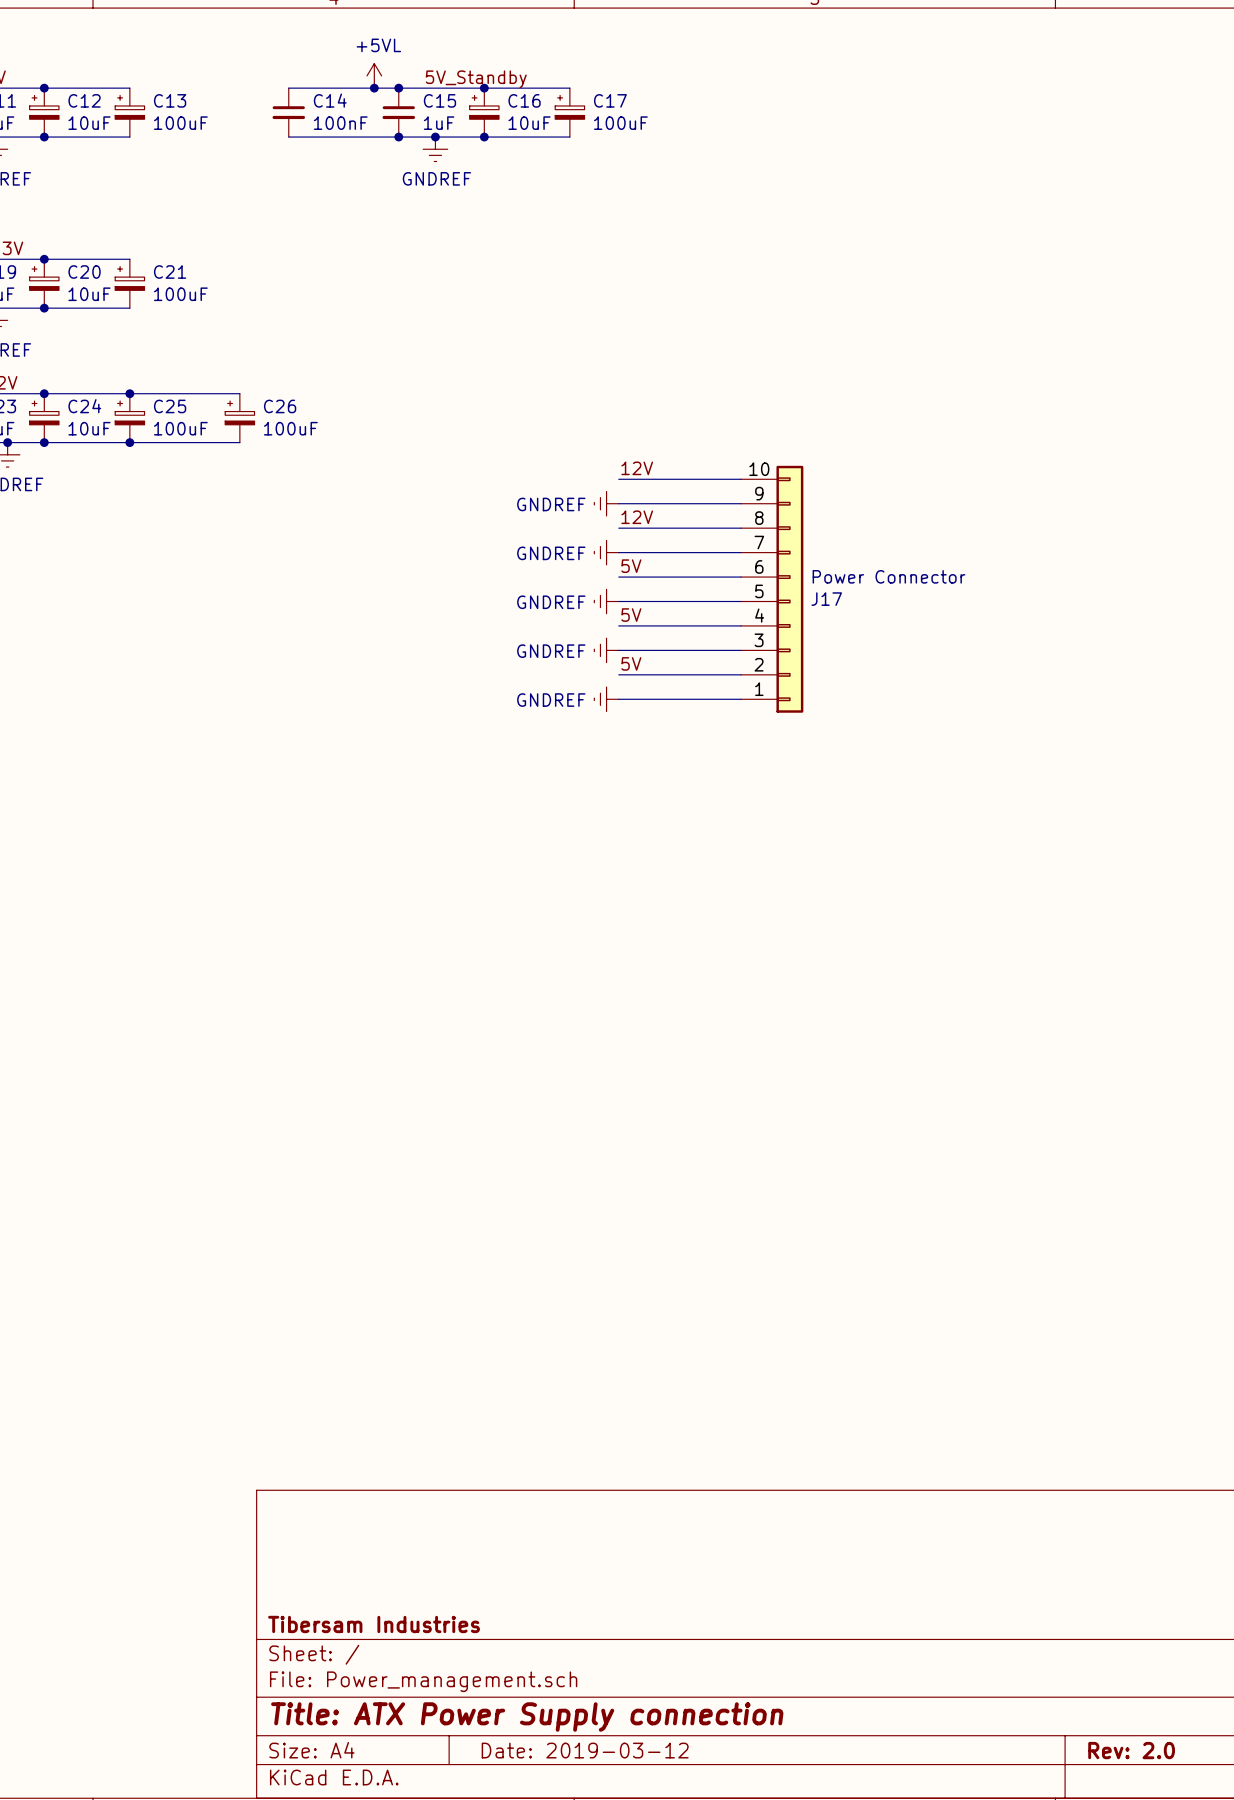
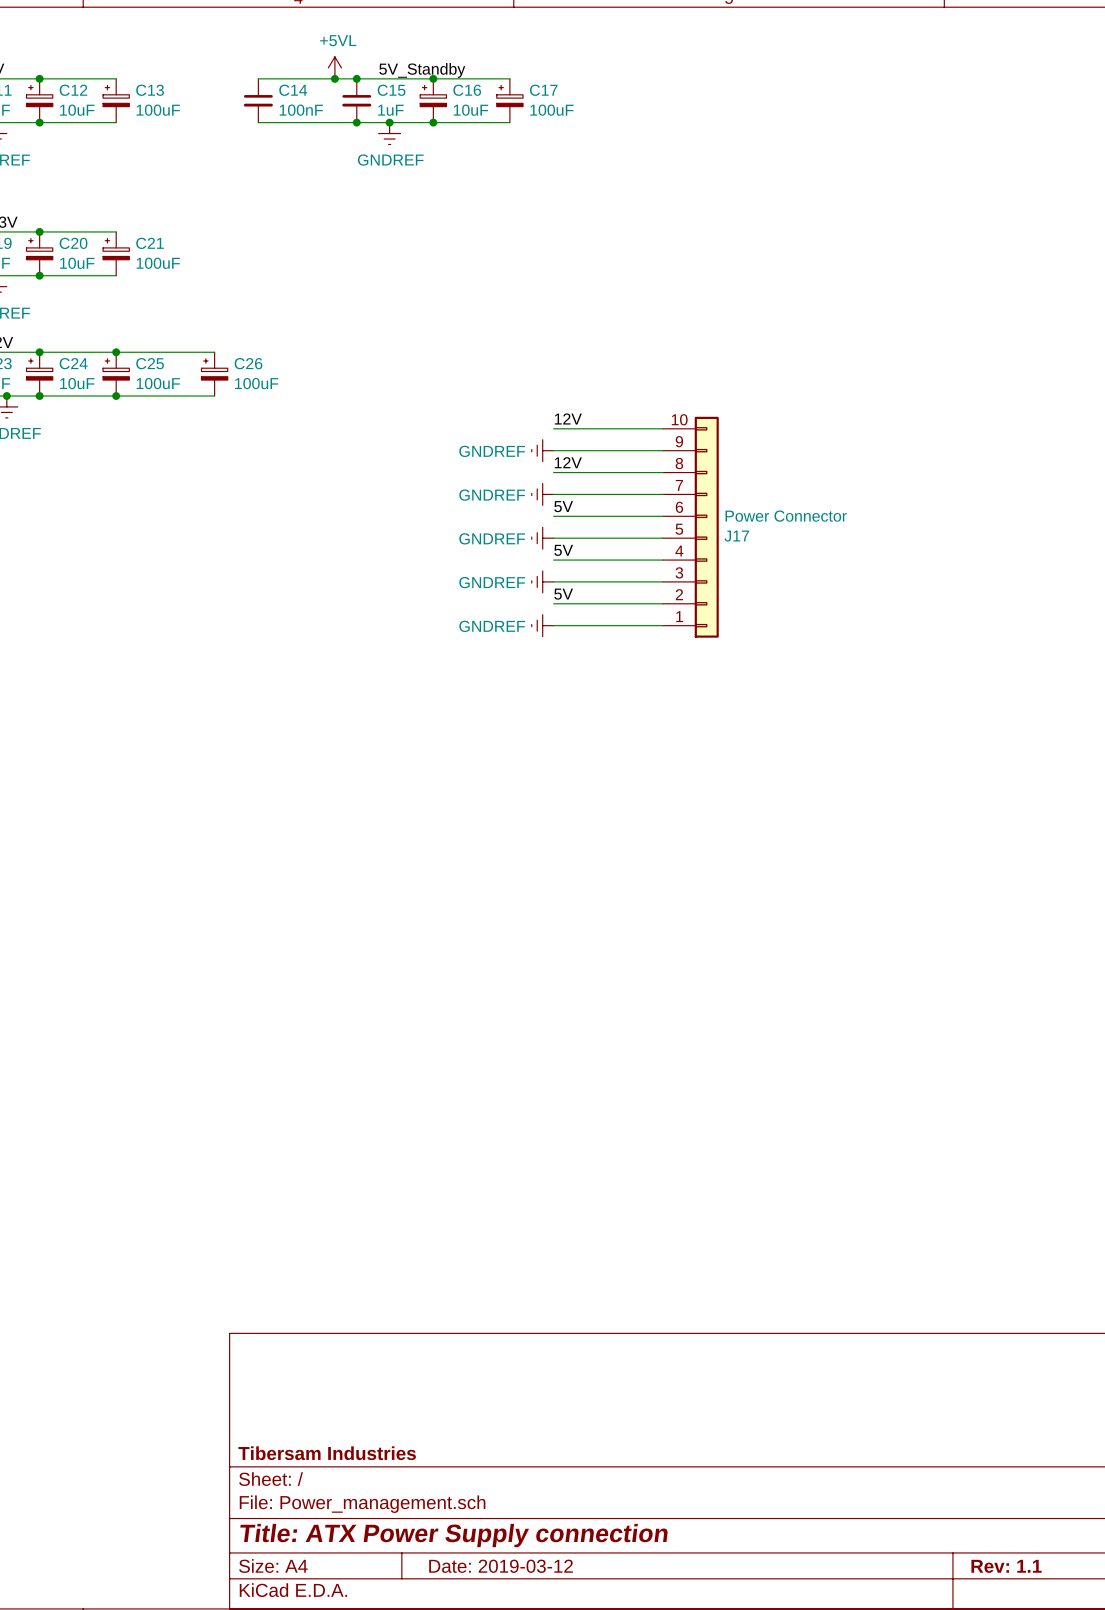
title block: Rev: 2.0 (1131, 1750) -> Rev: 1.1 (1006, 1566)

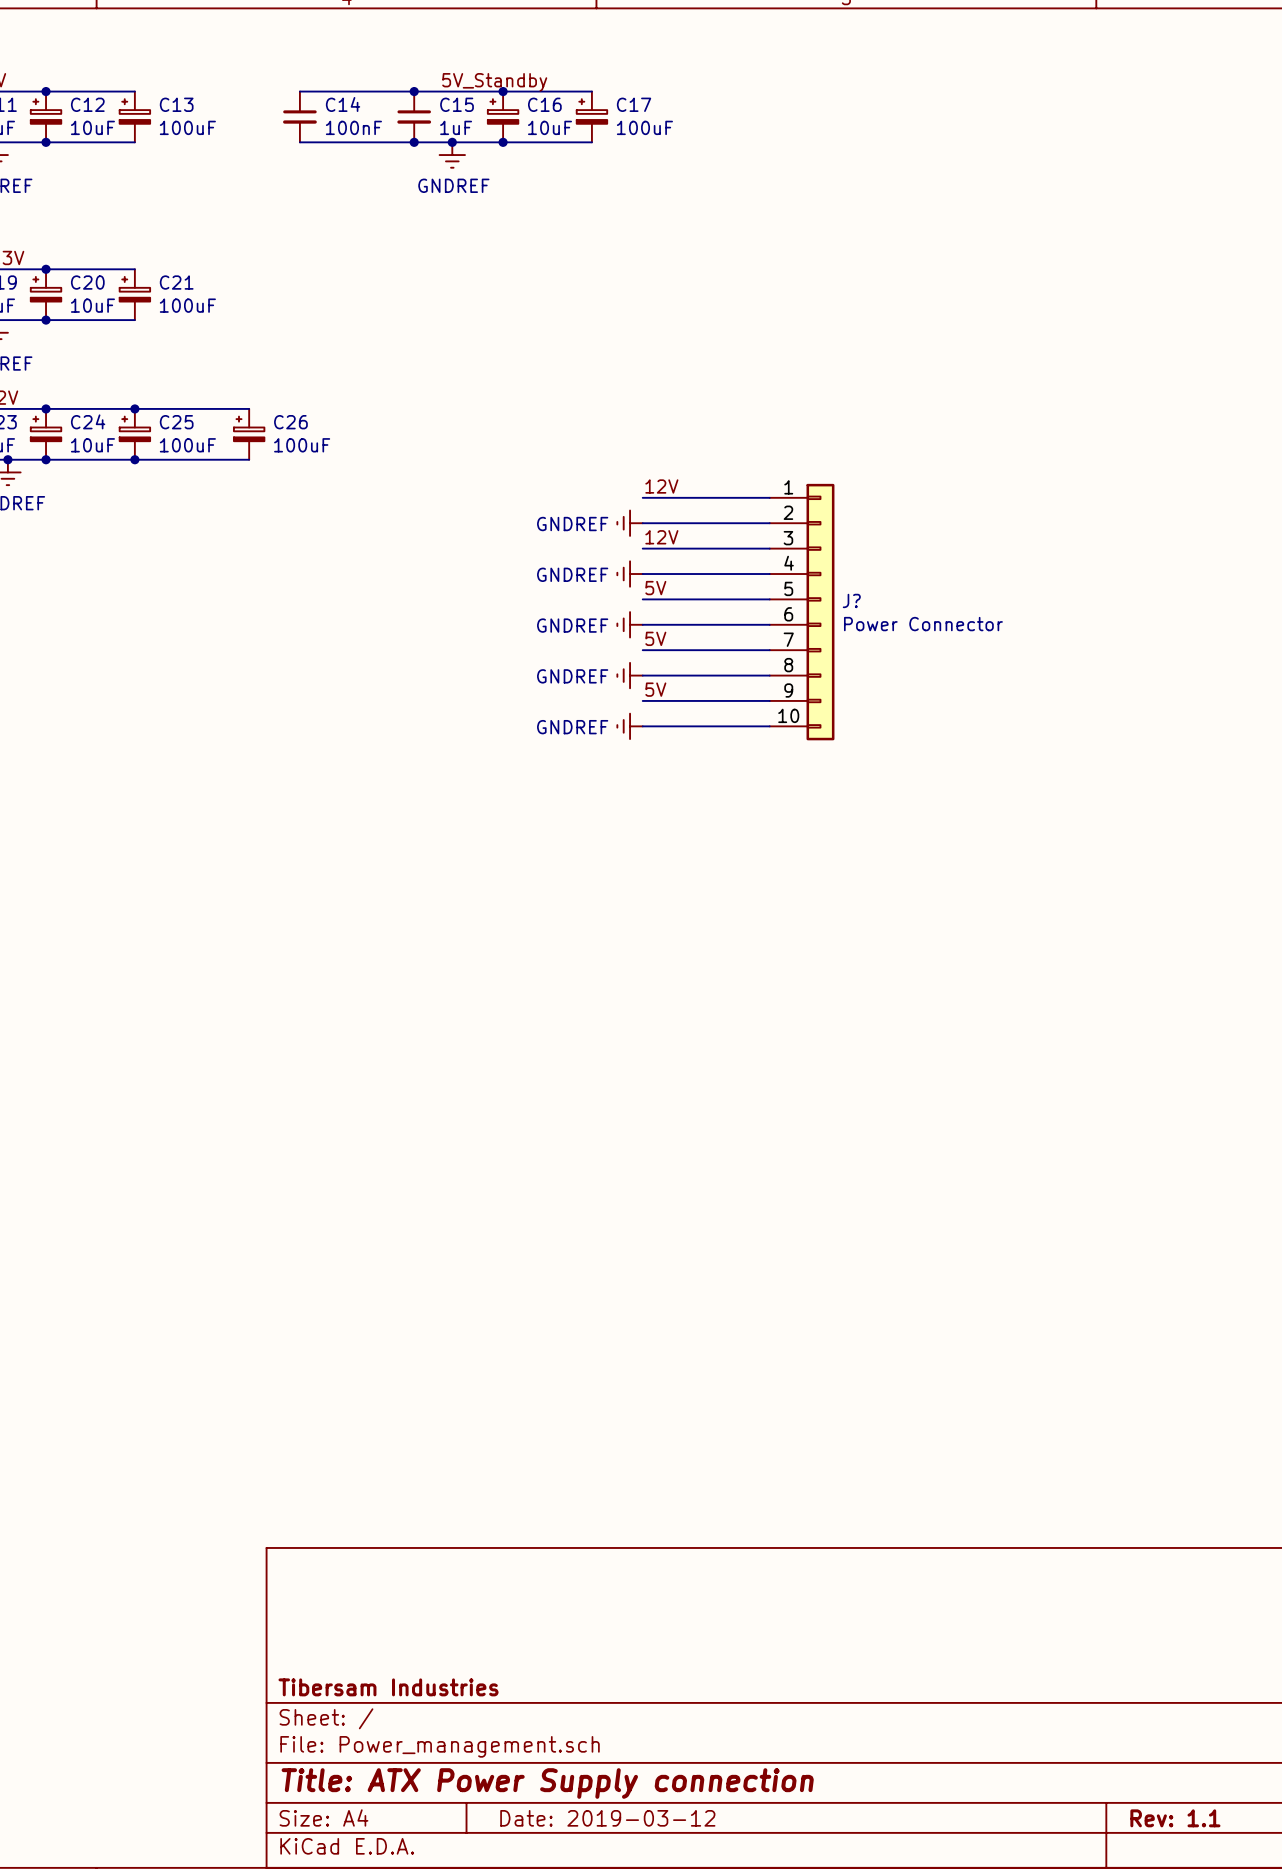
power symbol: +5VL (334, 67) -> none
junction: (334, 78) -> none
J17 flip: as is (706, 527) -> up-down (820, 612)
J17 name: J17 (736, 536) -> J? (851, 600)

